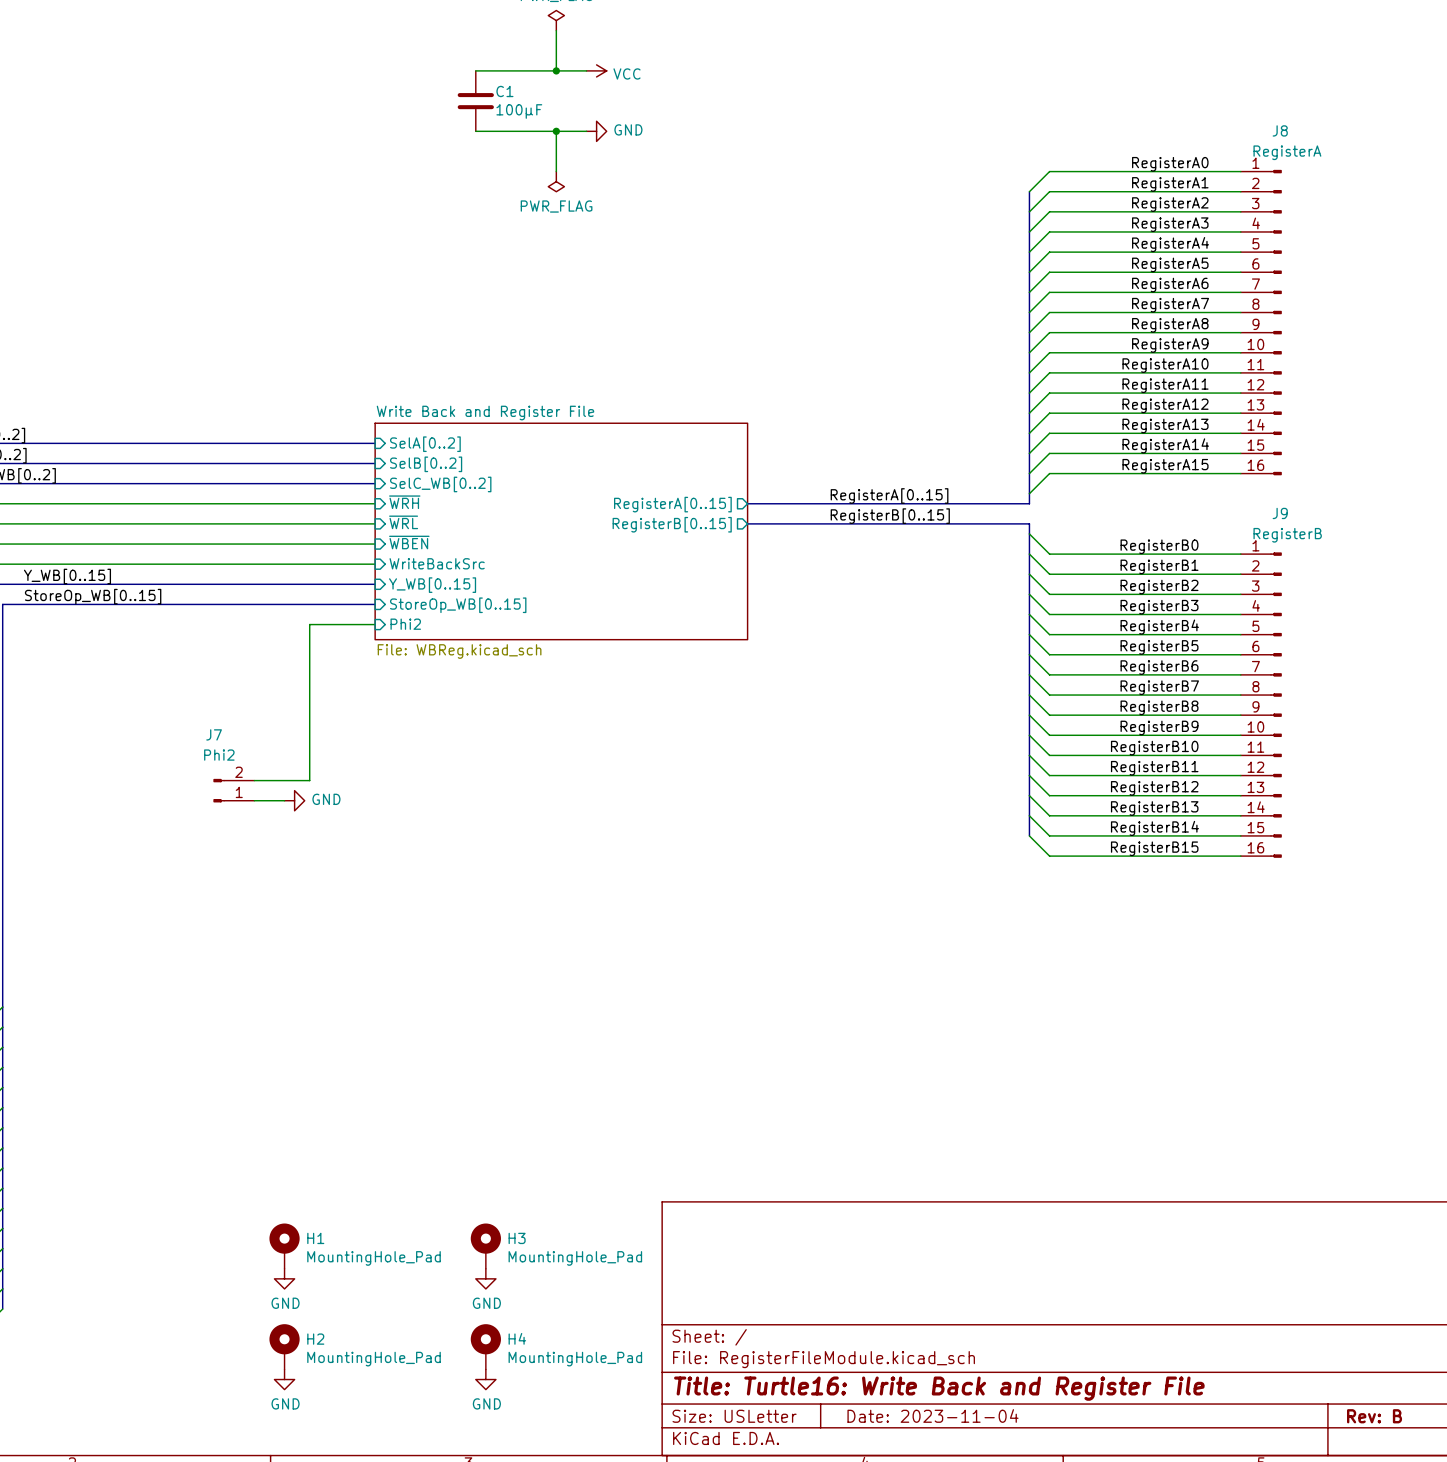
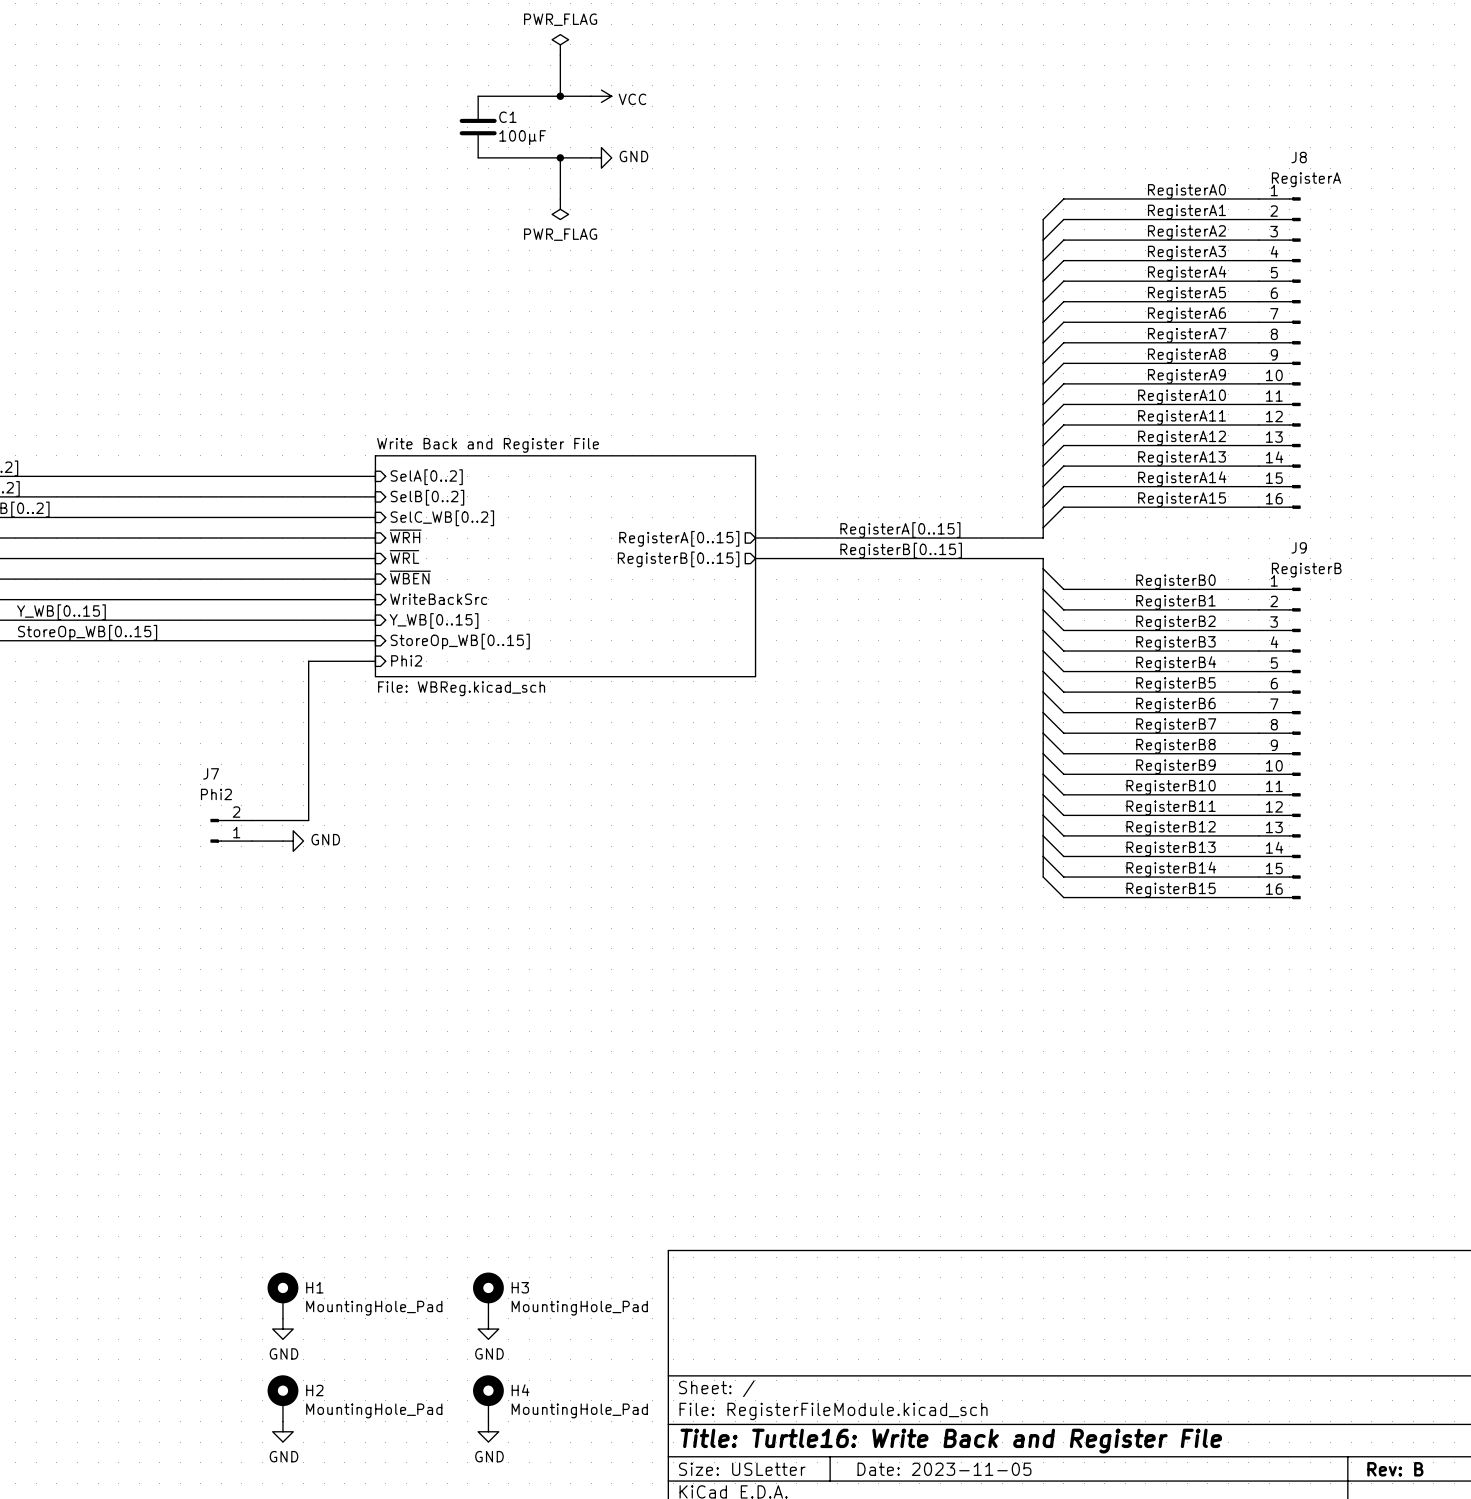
title block: Date: 2023-11-04 (932, 1415) -> Date: 2023-11-05 (944, 1469)

